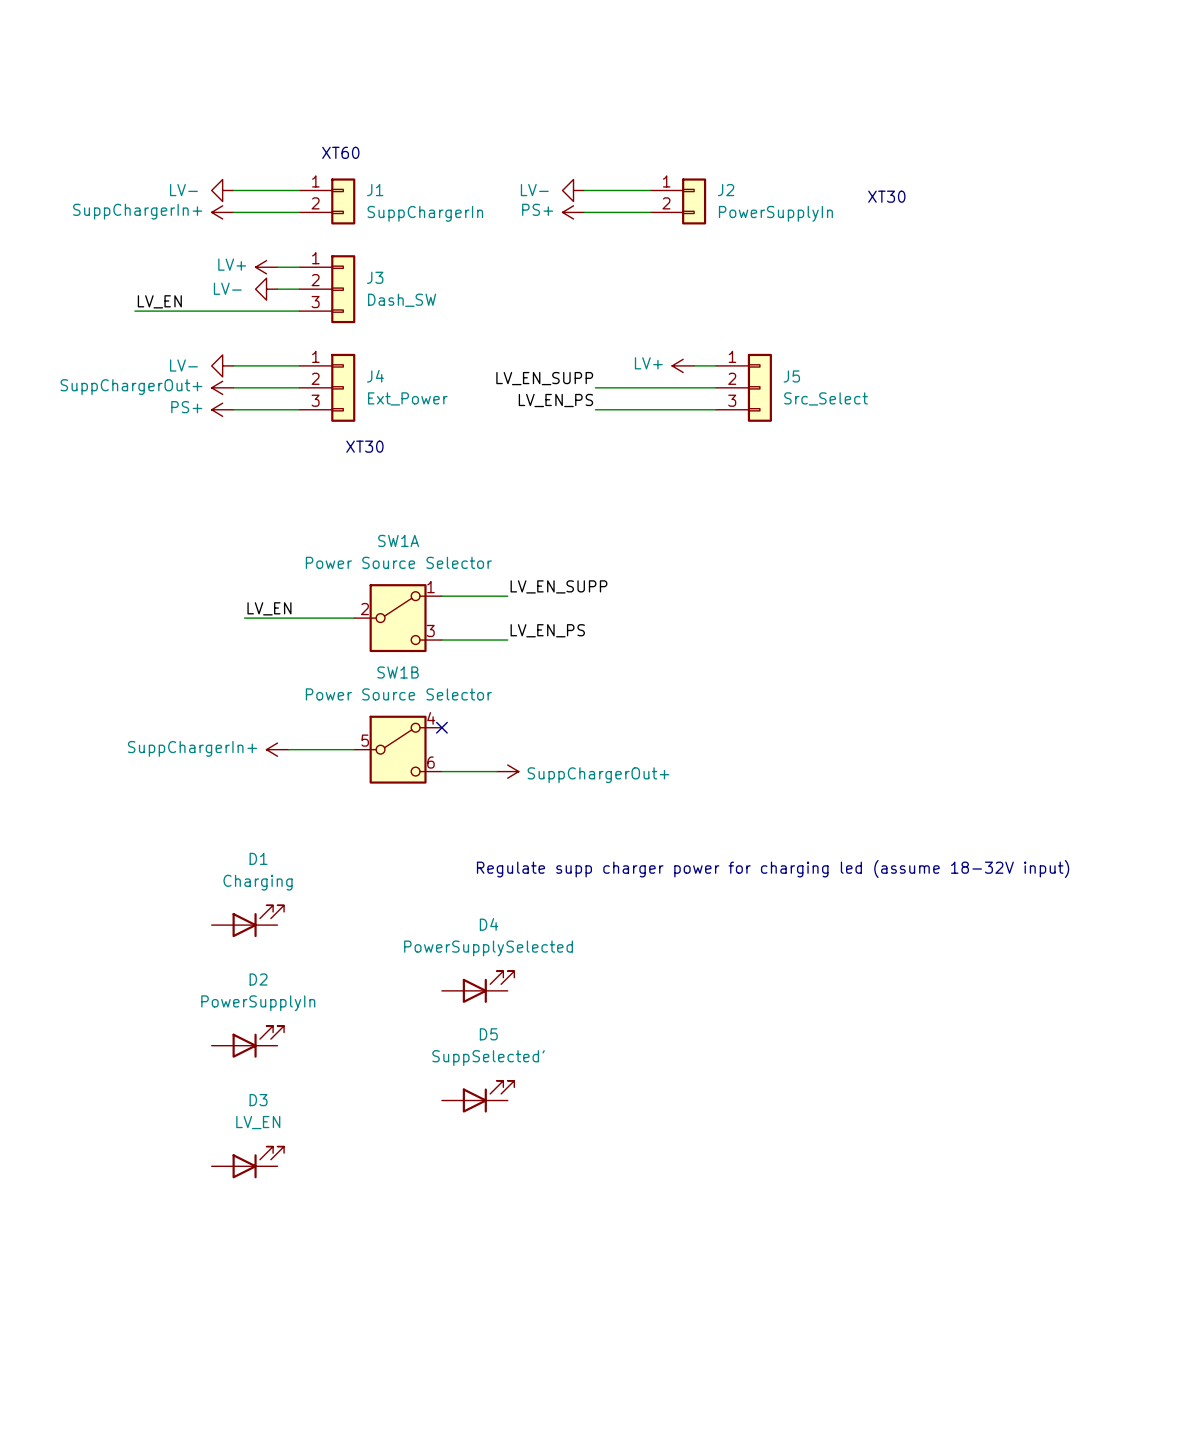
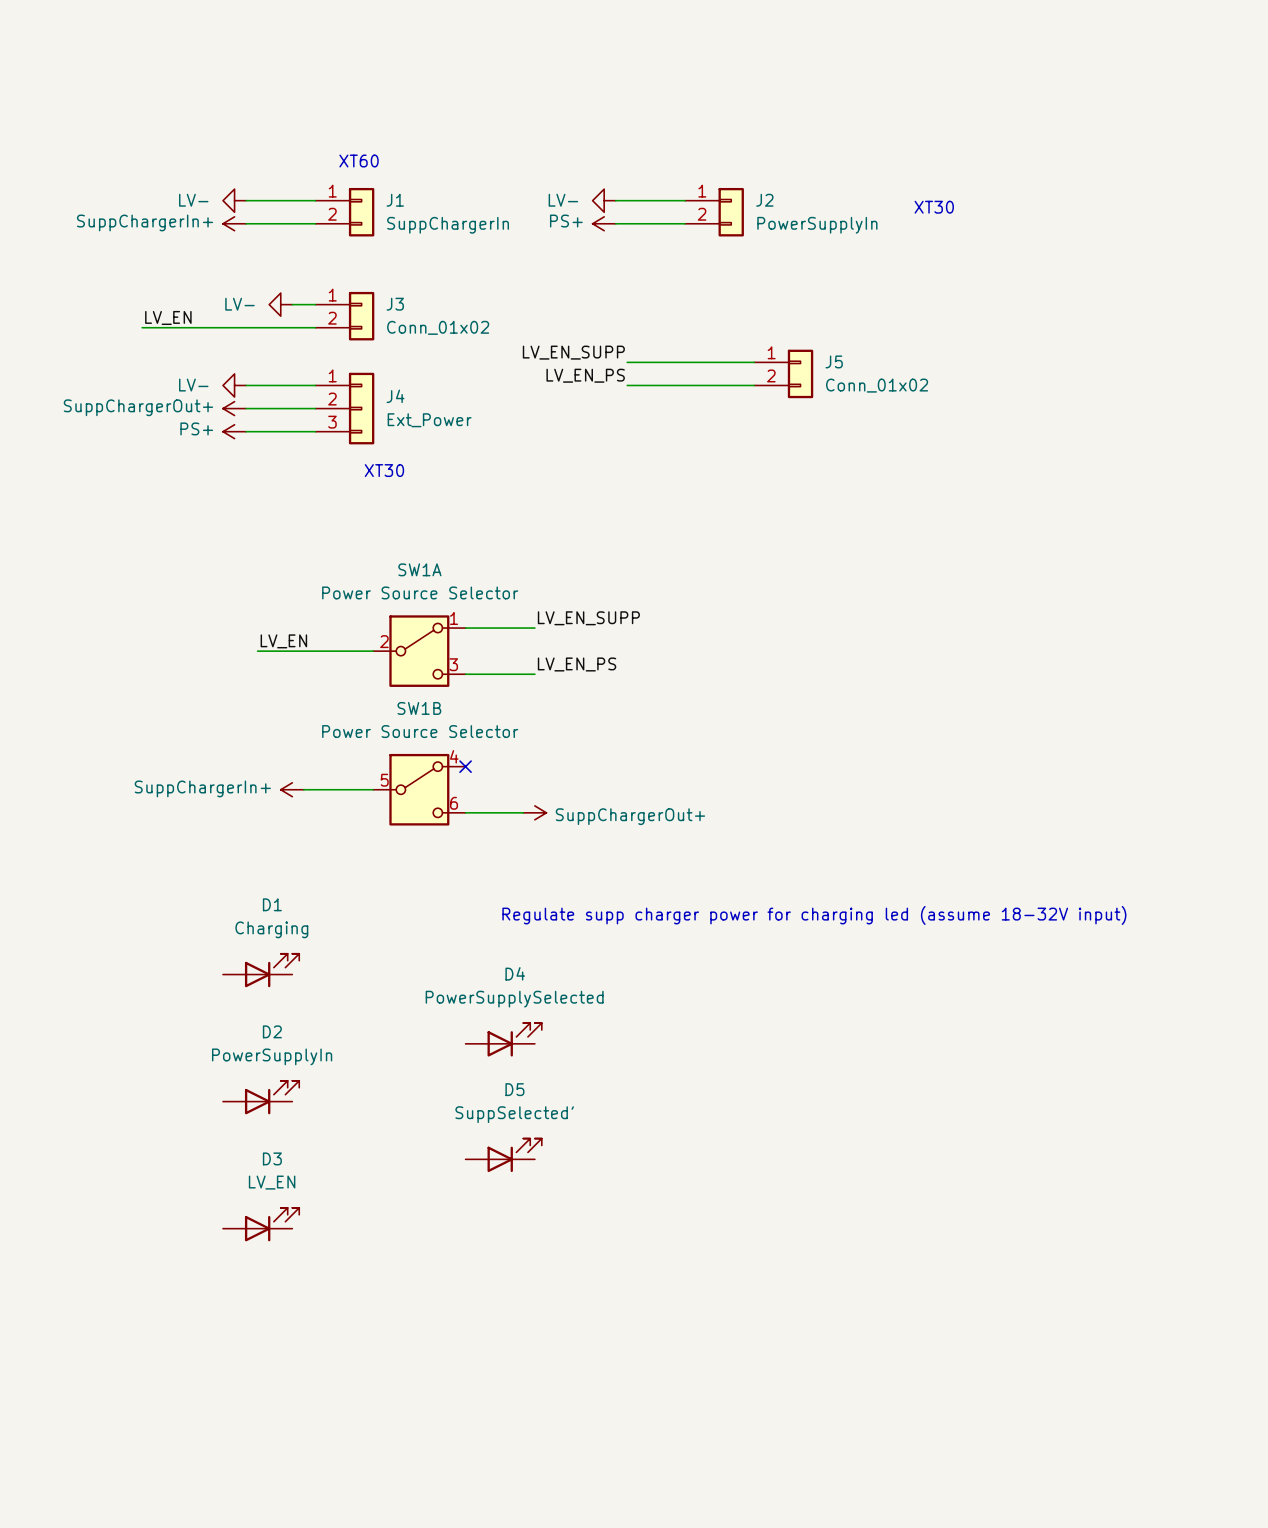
J3 symbol: [299, 255, 356, 324] -> [315, 291, 375, 341]
power symbol: LV+ (266, 267) -> none
wire: (277, 267) (299, 267) -> none
J3 value: Dash_SW (402, 300) -> Conn_01x02 (438, 327)
J5 symbol: [716, 353, 772, 422] -> [754, 349, 814, 399]
wire: none -> (627, 385) (731, 385)
power symbol: LV+ (683, 365) -> none
label position: LV_EN_SUPP (544, 378) -> LV_EN_SUPP (573, 352)
wire: (595, 387) (716, 387) -> (627, 362) (754, 362)
J5 value: Src_Select (826, 398) -> Conn_01x02 (877, 385)
label position: LV_EN_PS (555, 400) -> LV_EN_PS (585, 375)
wire: (595, 409) (716, 409) -> none

